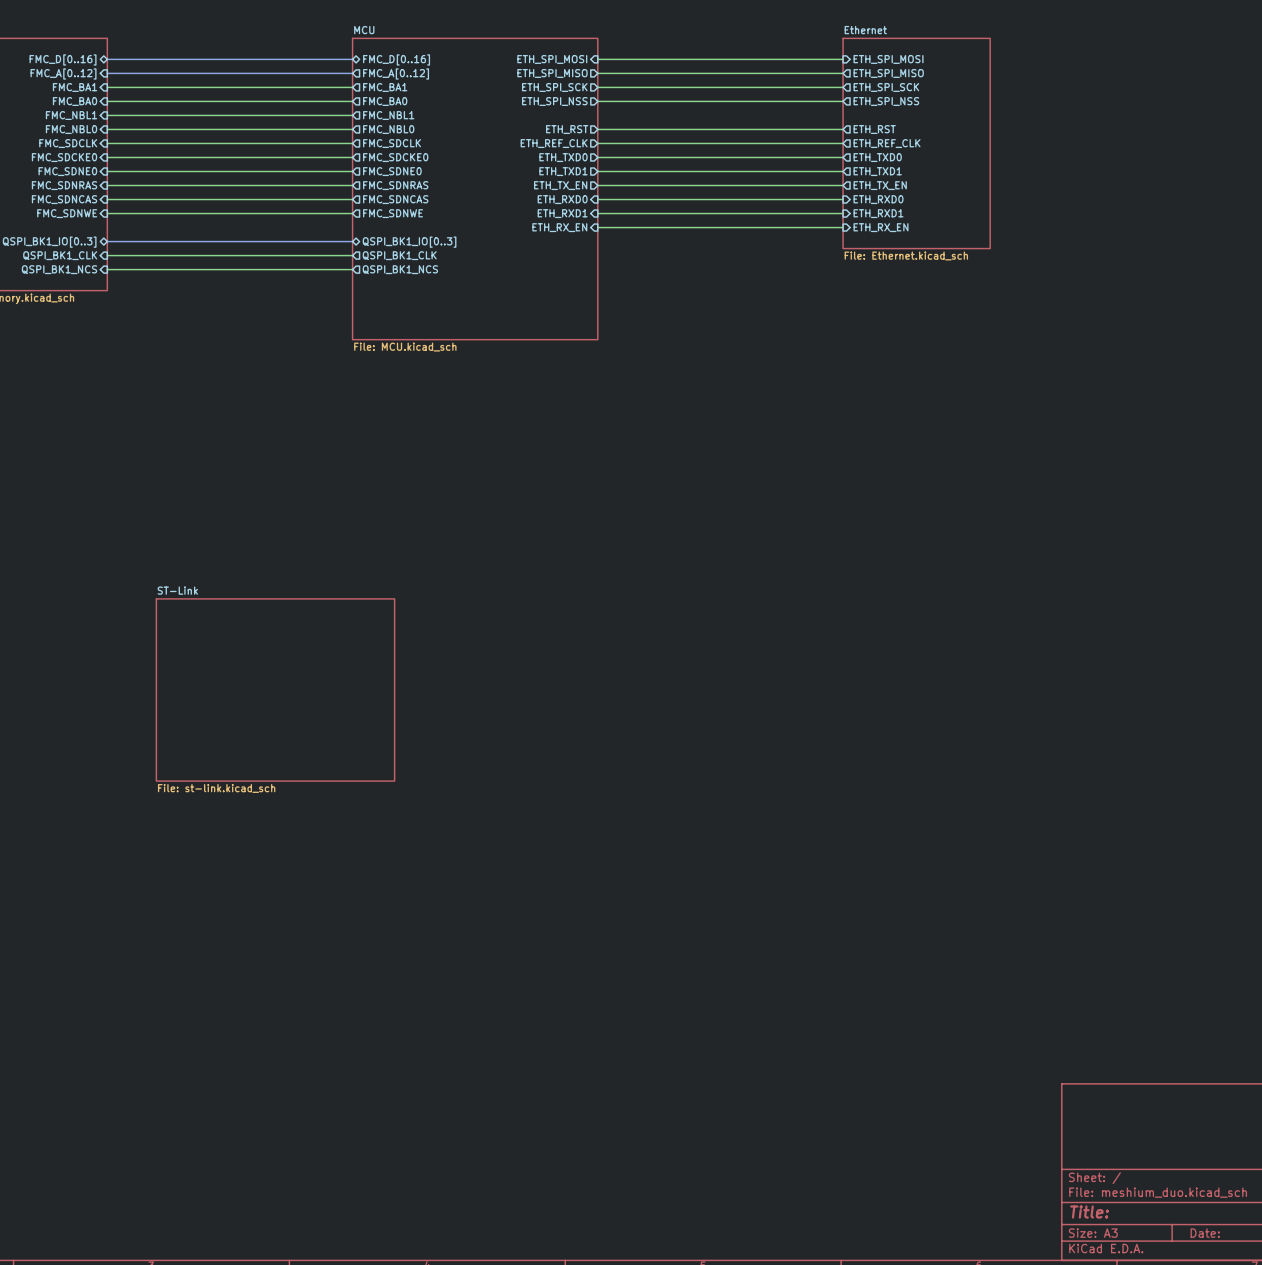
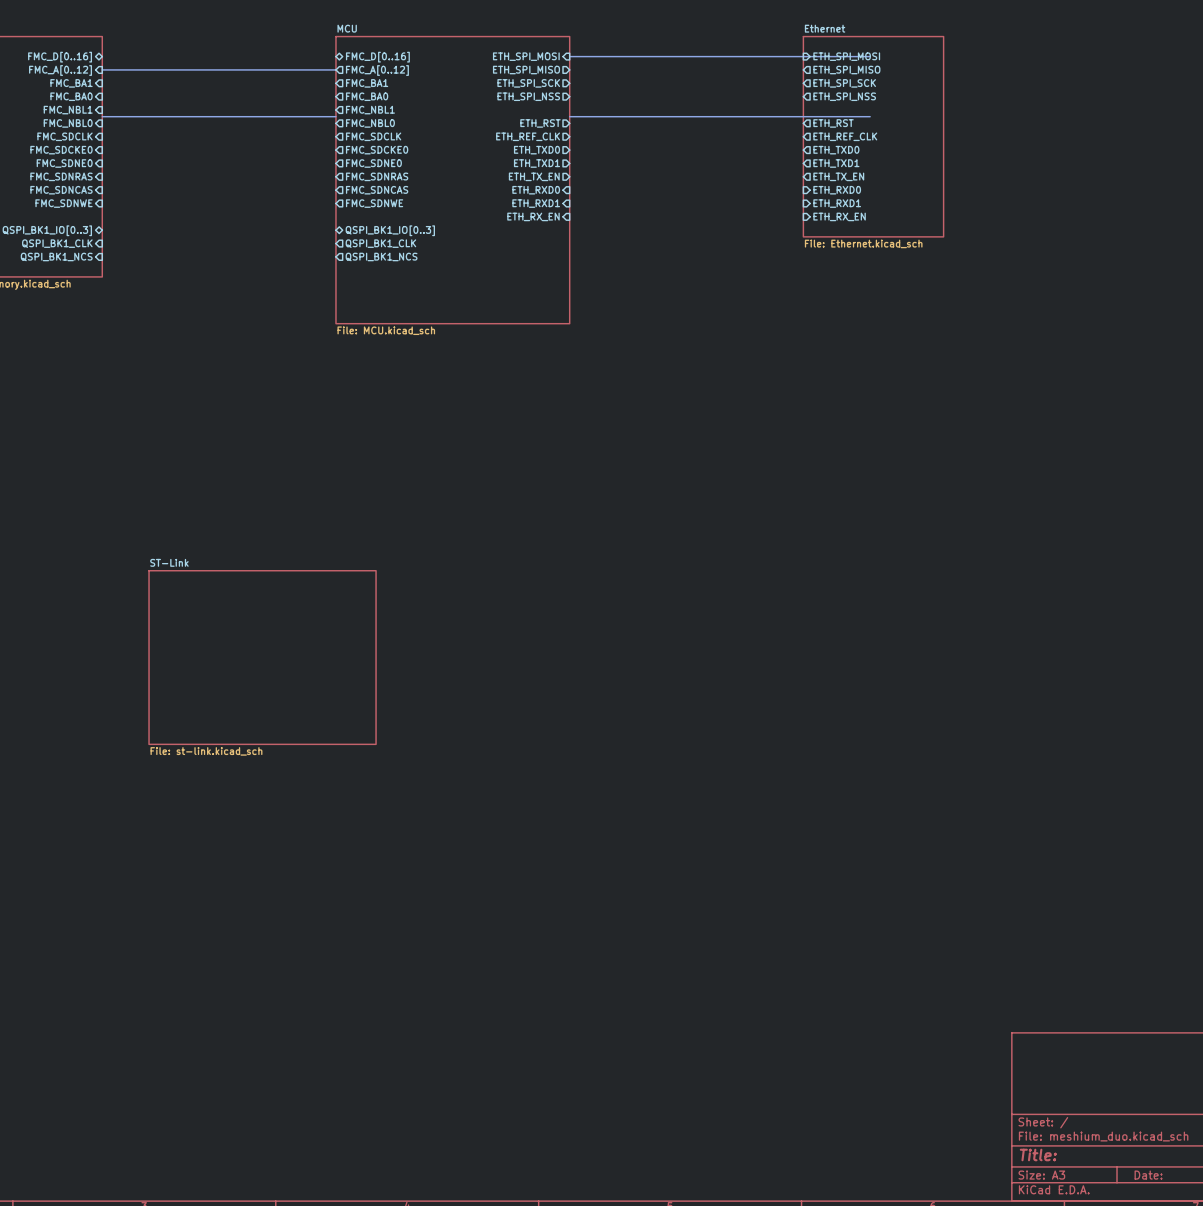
bus: (107, 59) (352, 59) -> (102, 116) (335, 116)
bus: none -> (569, 56) (870, 56)
wire: (597, 73) (843, 73) -> none
wire: (107, 87) (352, 87) -> none
wire: (597, 87) (843, 87) -> none
wire: (107, 101) (352, 101) -> none
wire: (597, 101) (843, 101) -> none
wire: (107, 115) (352, 115) -> none
bus: none -> (569, 116) (870, 116)
wire: (107, 129) (352, 129) -> none
wire: (597, 129) (843, 129) -> none
wire: (107, 143) (352, 143) -> none
wire: (597, 143) (843, 143) -> none
wire: (107, 157) (352, 157) -> none
wire: (597, 157) (843, 157) -> none
wire: (107, 171) (352, 171) -> none
wire: (597, 171) (843, 171) -> none
wire: (107, 185) (352, 185) -> none
wire: (597, 185) (843, 185) -> none
wire: (107, 199) (352, 199) -> none
wire: (597, 199) (843, 199) -> none
wire: (107, 213) (352, 213) -> none
wire: (597, 213) (843, 213) -> none
wire: (597, 227) (843, 227) -> none
bus: (107, 241) (352, 241) -> none
wire: (107, 255) (352, 255) -> none
wire: (107, 269) (352, 269) -> none

